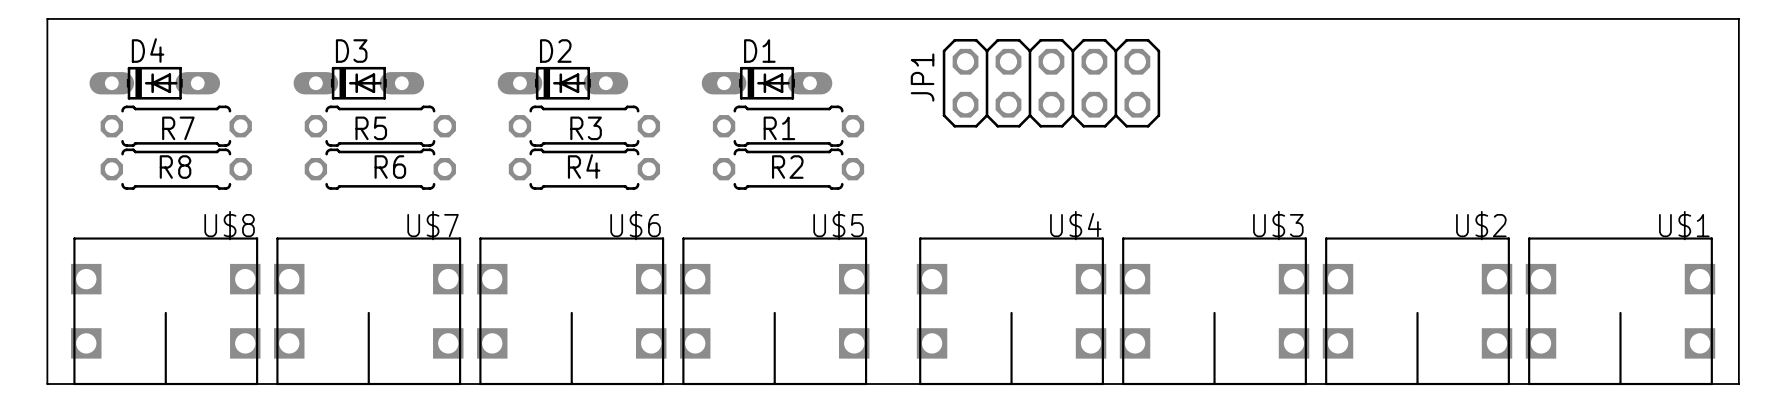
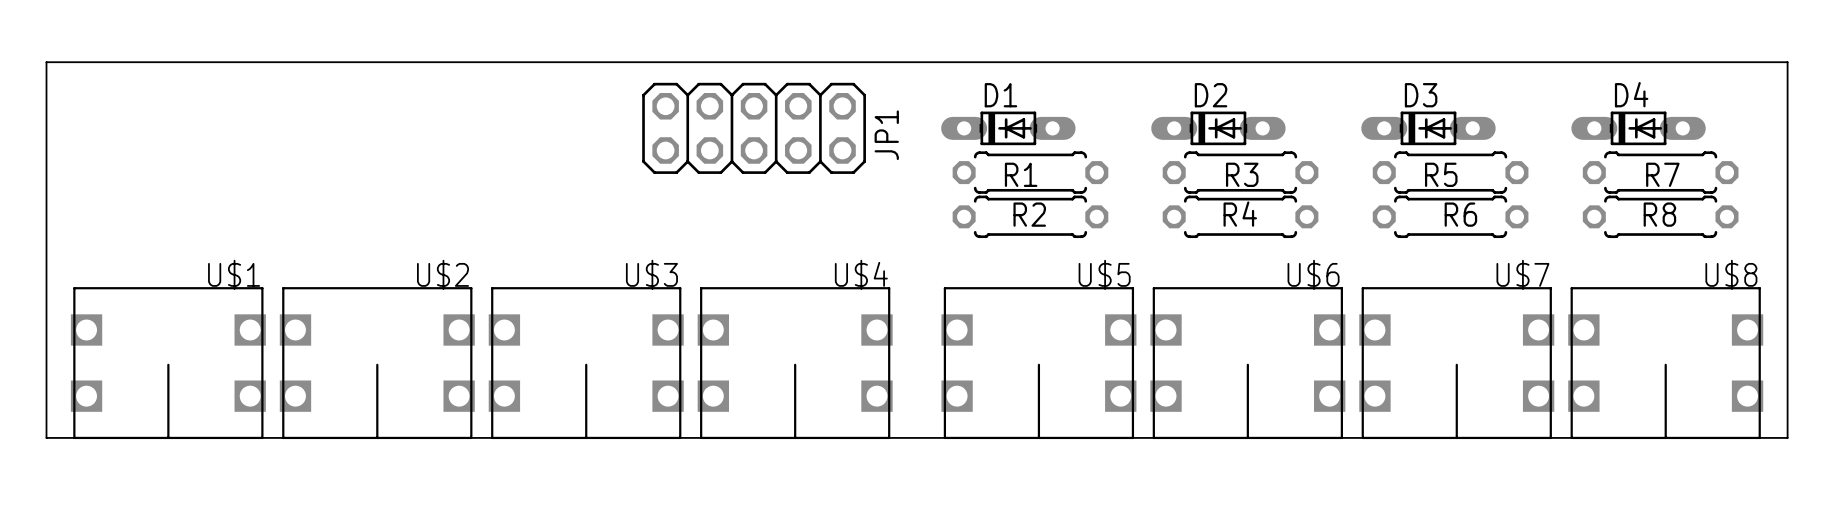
JP1 name position: JP1 (922, 77) -> JP1 (886, 135)
D4 position: (154, 83) -> (1638, 128)
D3 position: (358, 83) -> (1428, 128)
D2 position: (562, 83) -> (1218, 128)
D1 position: (767, 83) -> (1008, 128)
JP1 position: (1051, 83) -> (754, 128)
R7 position: (176, 126) -> (1660, 172)
R5 position: (380, 126) -> (1450, 172)
R3 position: (584, 126) -> (1240, 172)
R1 position: (788, 126) -> (1030, 172)
R8 position: (176, 169) -> (1660, 216)
R6 position: (380, 169) -> (1450, 216)
R4 position: (584, 169) -> (1240, 216)
R2 position: (788, 169) -> (1030, 216)
U$8 name: U$8 (229, 225) -> U$1 (234, 274)
U$7 name: U$7 (433, 225) -> U$2 (443, 274)
U$6 name: U$6 (635, 225) -> U$3 (651, 274)
U$5 name: U$5 (838, 225) -> U$4 (861, 274)
U$4 name: U$4 (1075, 225) -> U$5 (1104, 274)
U$3 name: U$3 (1278, 225) -> U$6 (1313, 274)
U$2 name: U$2 (1481, 225) -> U$7 (1522, 274)
U$1 name: U$1 (1684, 225) -> U$8 (1731, 274)

